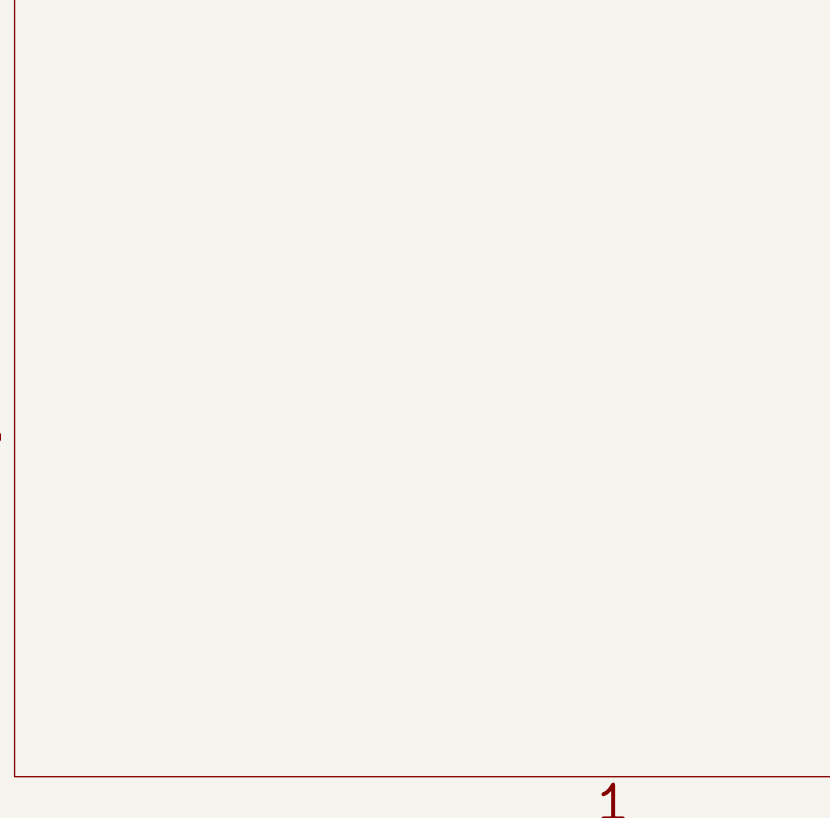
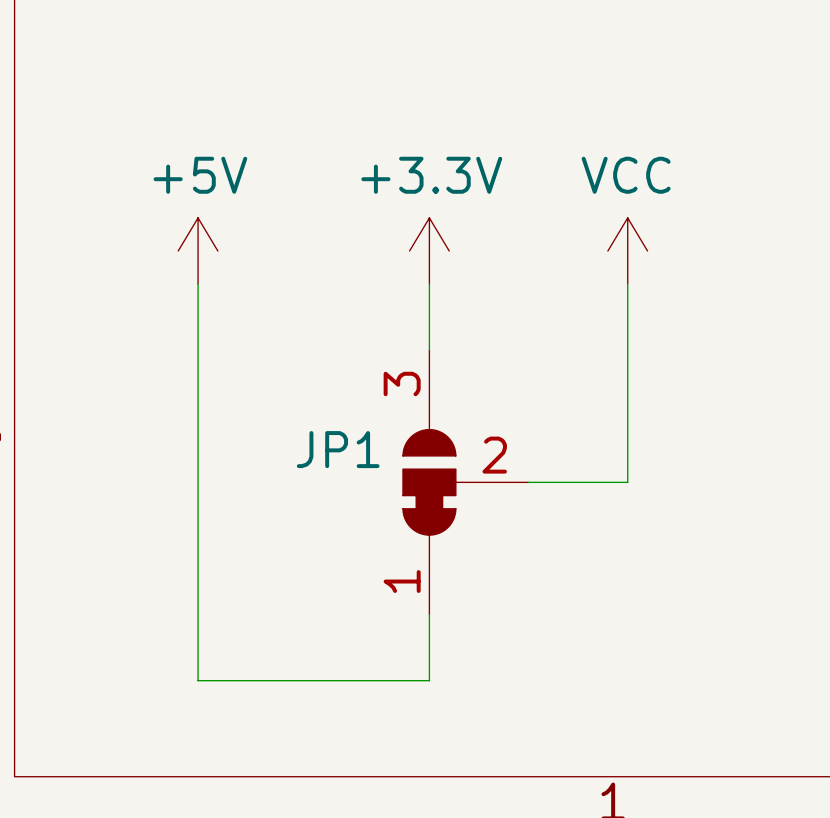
power symbol: none -> +5V (198, 251)
power symbol: none -> +3.3V (429, 251)
power symbol: none -> VCC (627, 251)
wire: none -> (198, 284) (198, 680) (429, 680) (429, 614)
wire: none -> (429, 284) (429, 350)
wire: none -> (627, 284) (627, 482) (528, 482)
JP1: none -> (465, 482)

